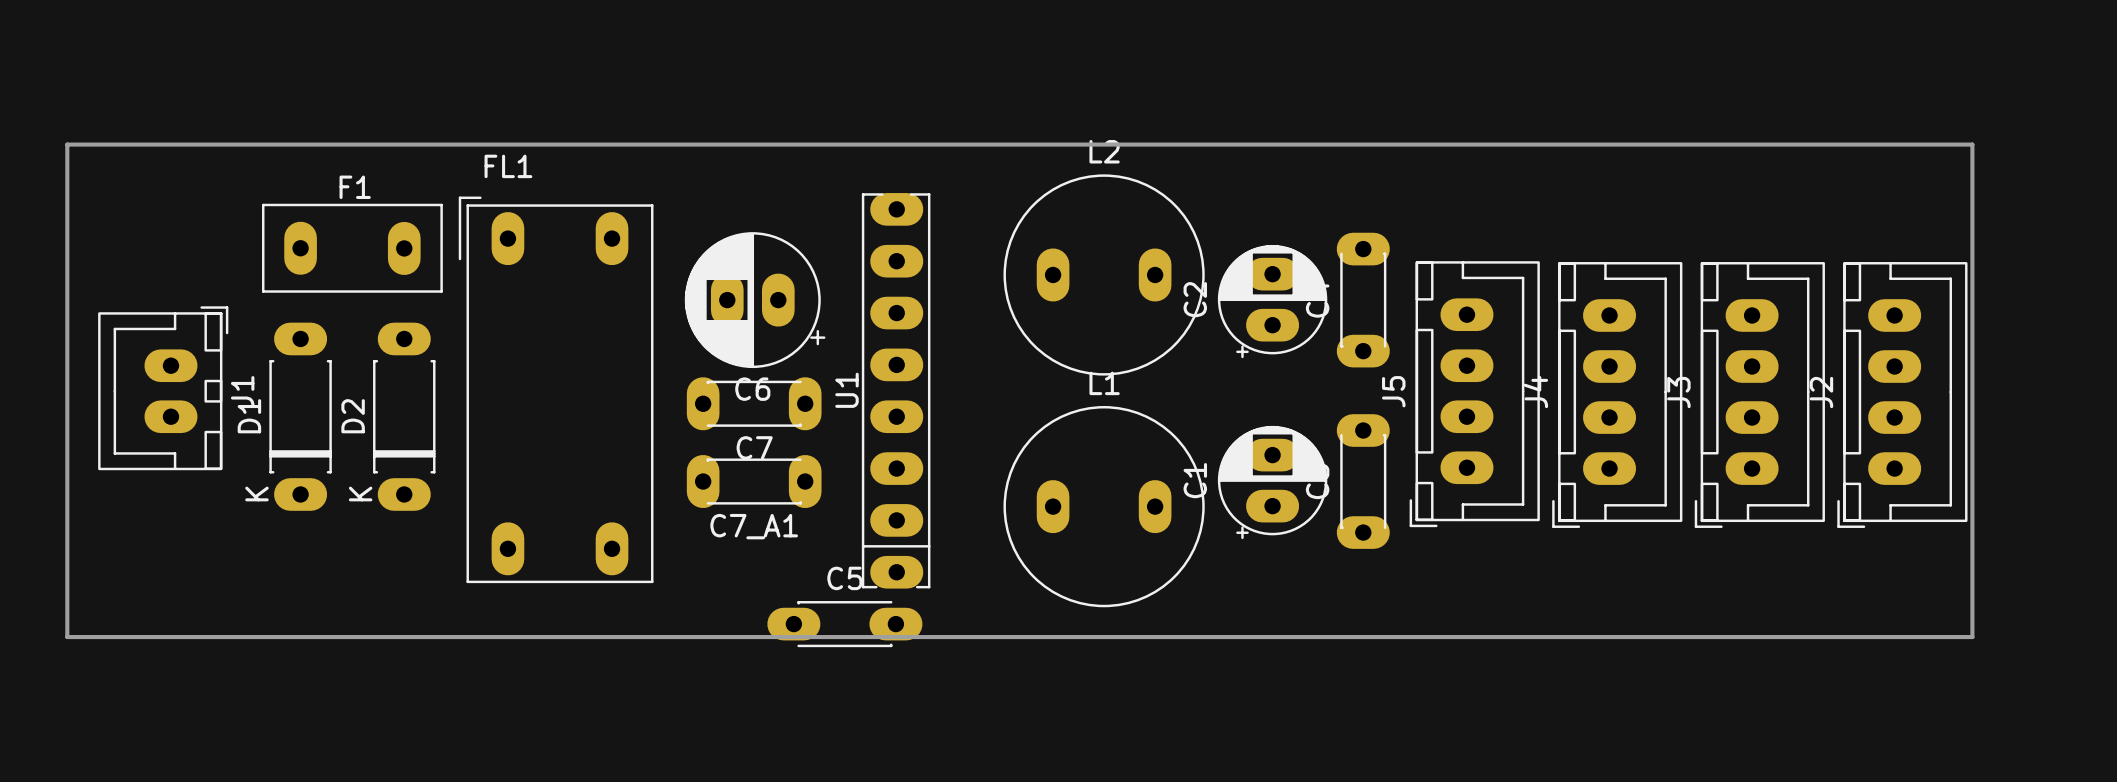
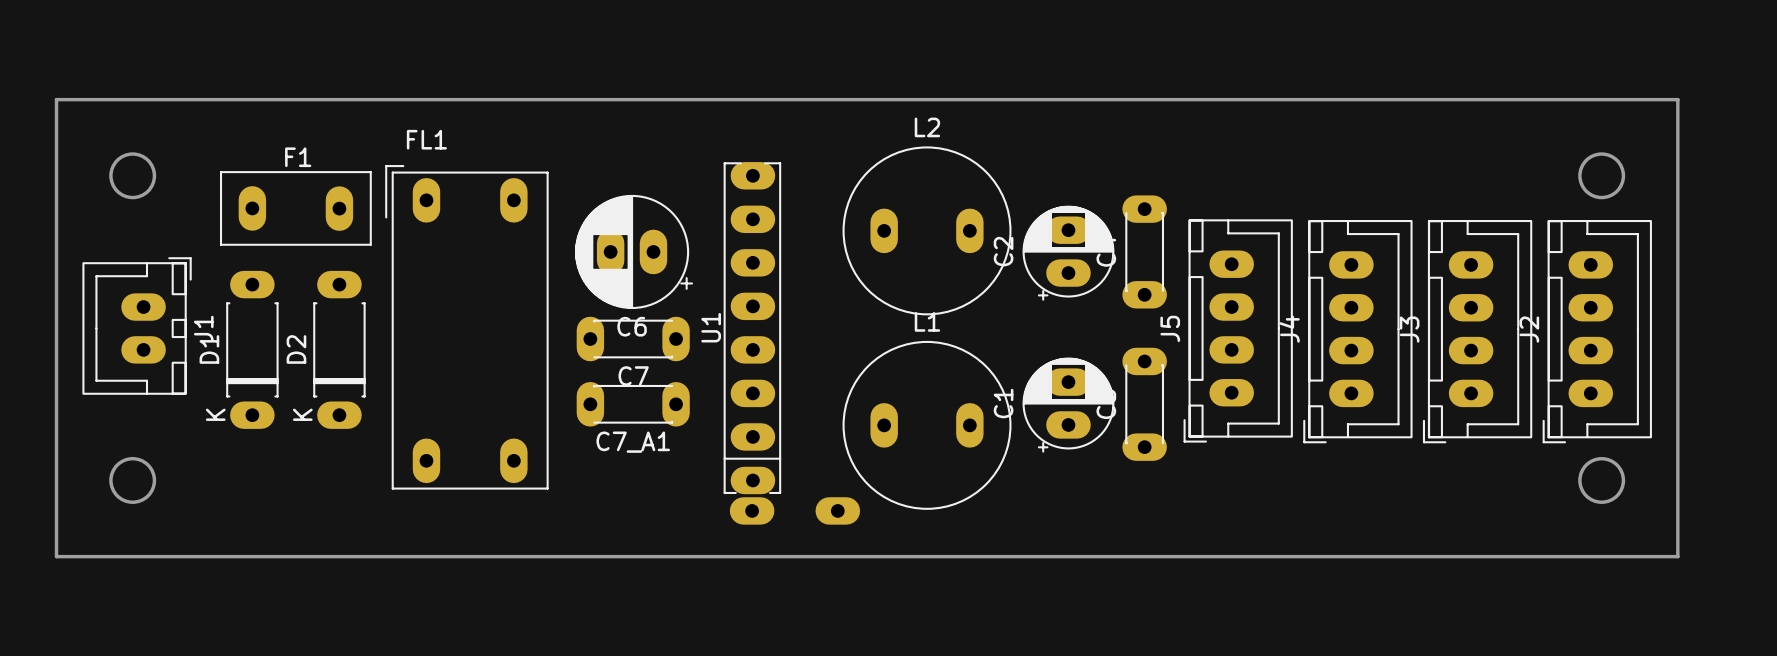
board edge: (67, 144) (1972, 144) (1972, 637) (67, 637) -> (56, 121) (56, 99) (1677, 99) (1677, 556) (56, 556) (56, 534)
round board edge: none -> [109, 152, 157, 200]
round board edge: none -> [1578, 152, 1626, 200]
round board edge: none -> [109, 456, 157, 504]
round board edge: none -> [1578, 456, 1626, 504]
C5 side: top (844, 624) -> bottom (794, 510)

